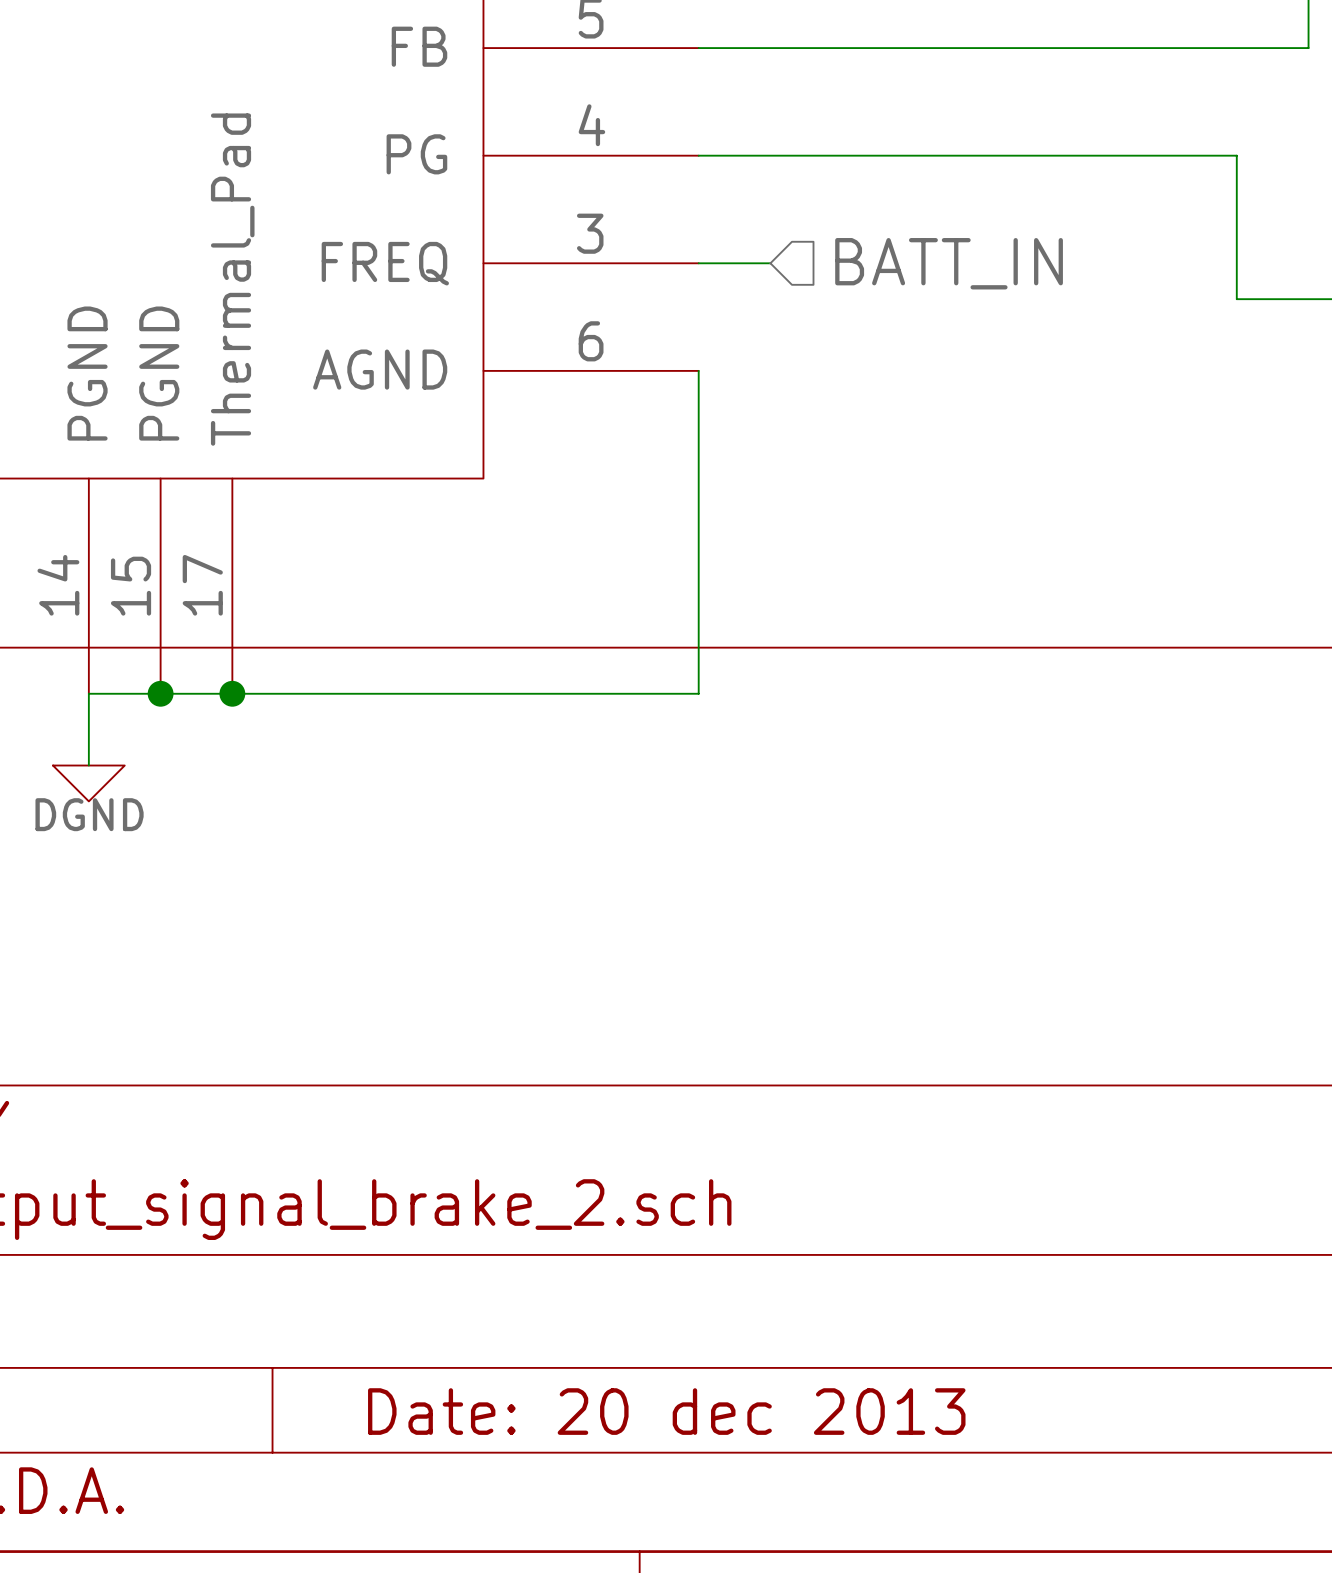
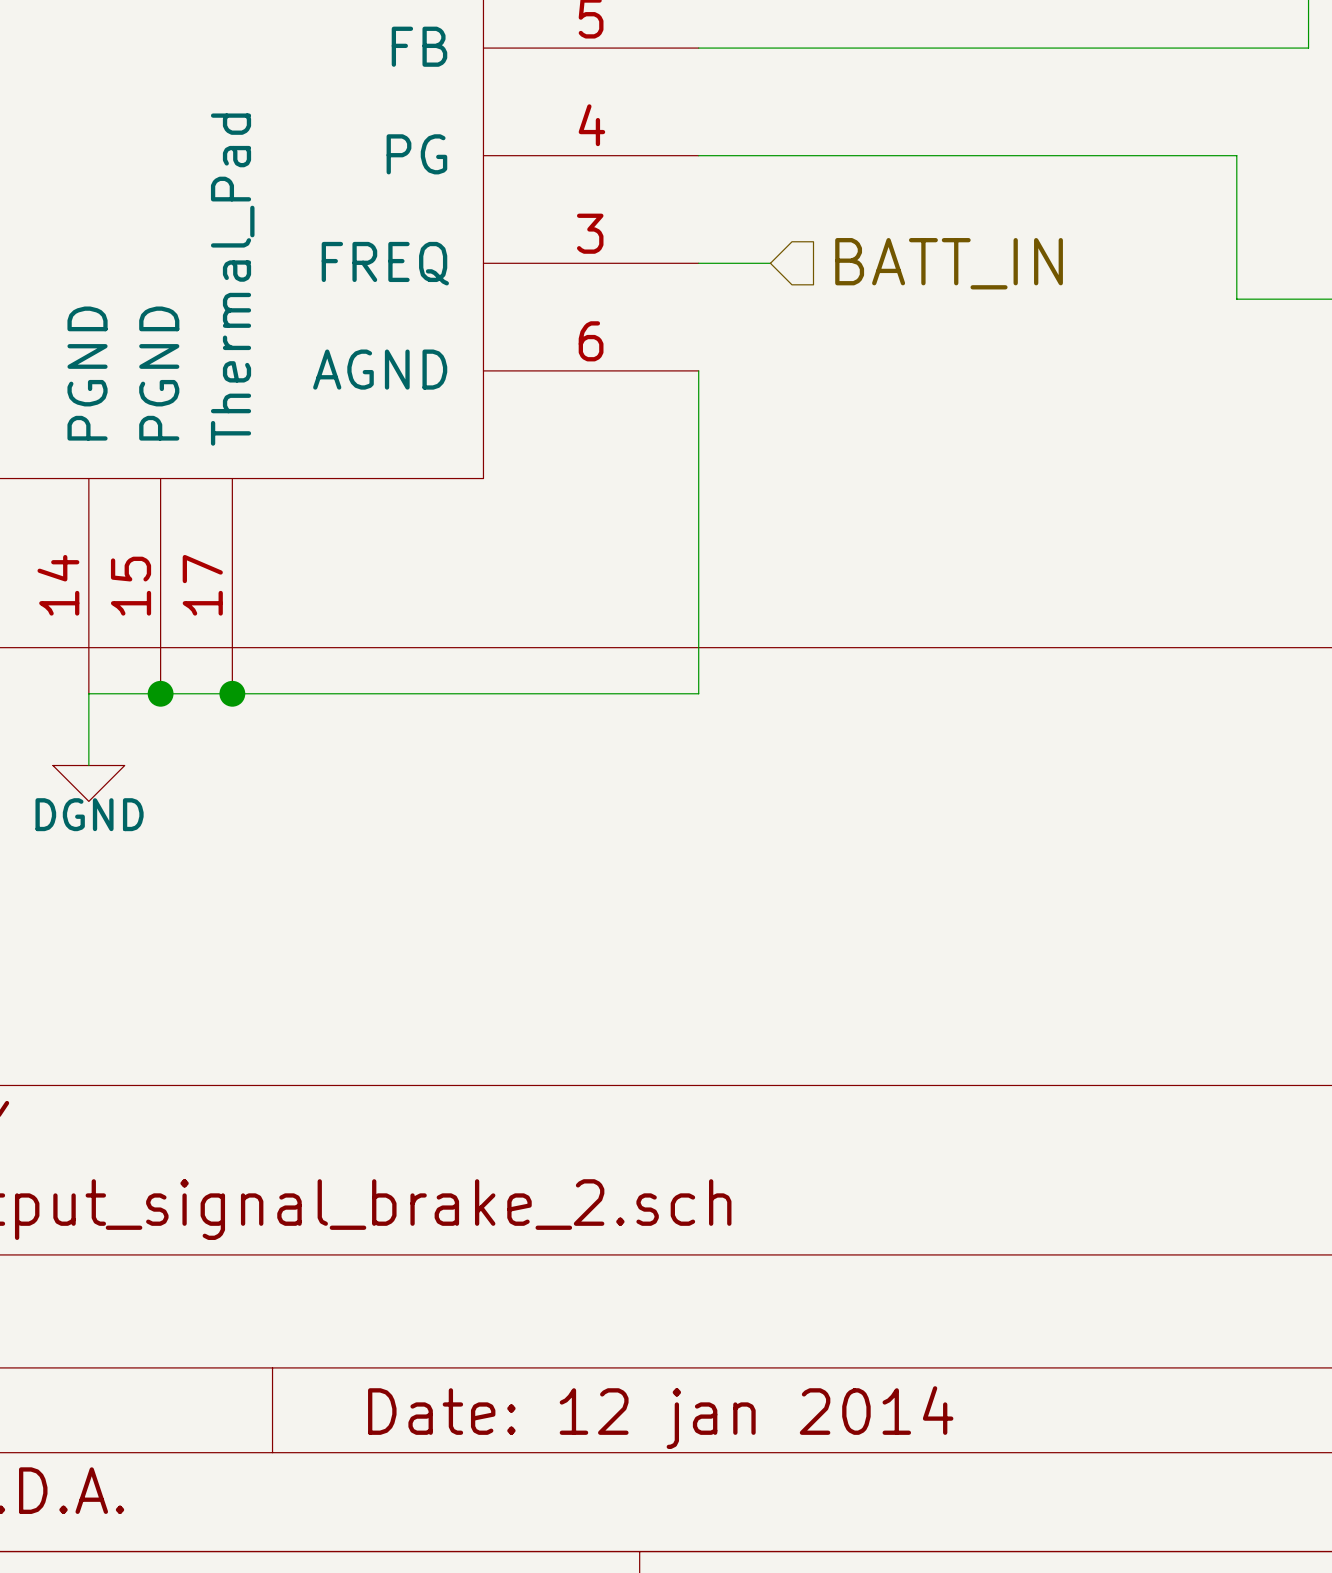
title block: Date: 20 dec 2013 (666, 1411) -> Date: 12 jan 2014 (660, 1417)

